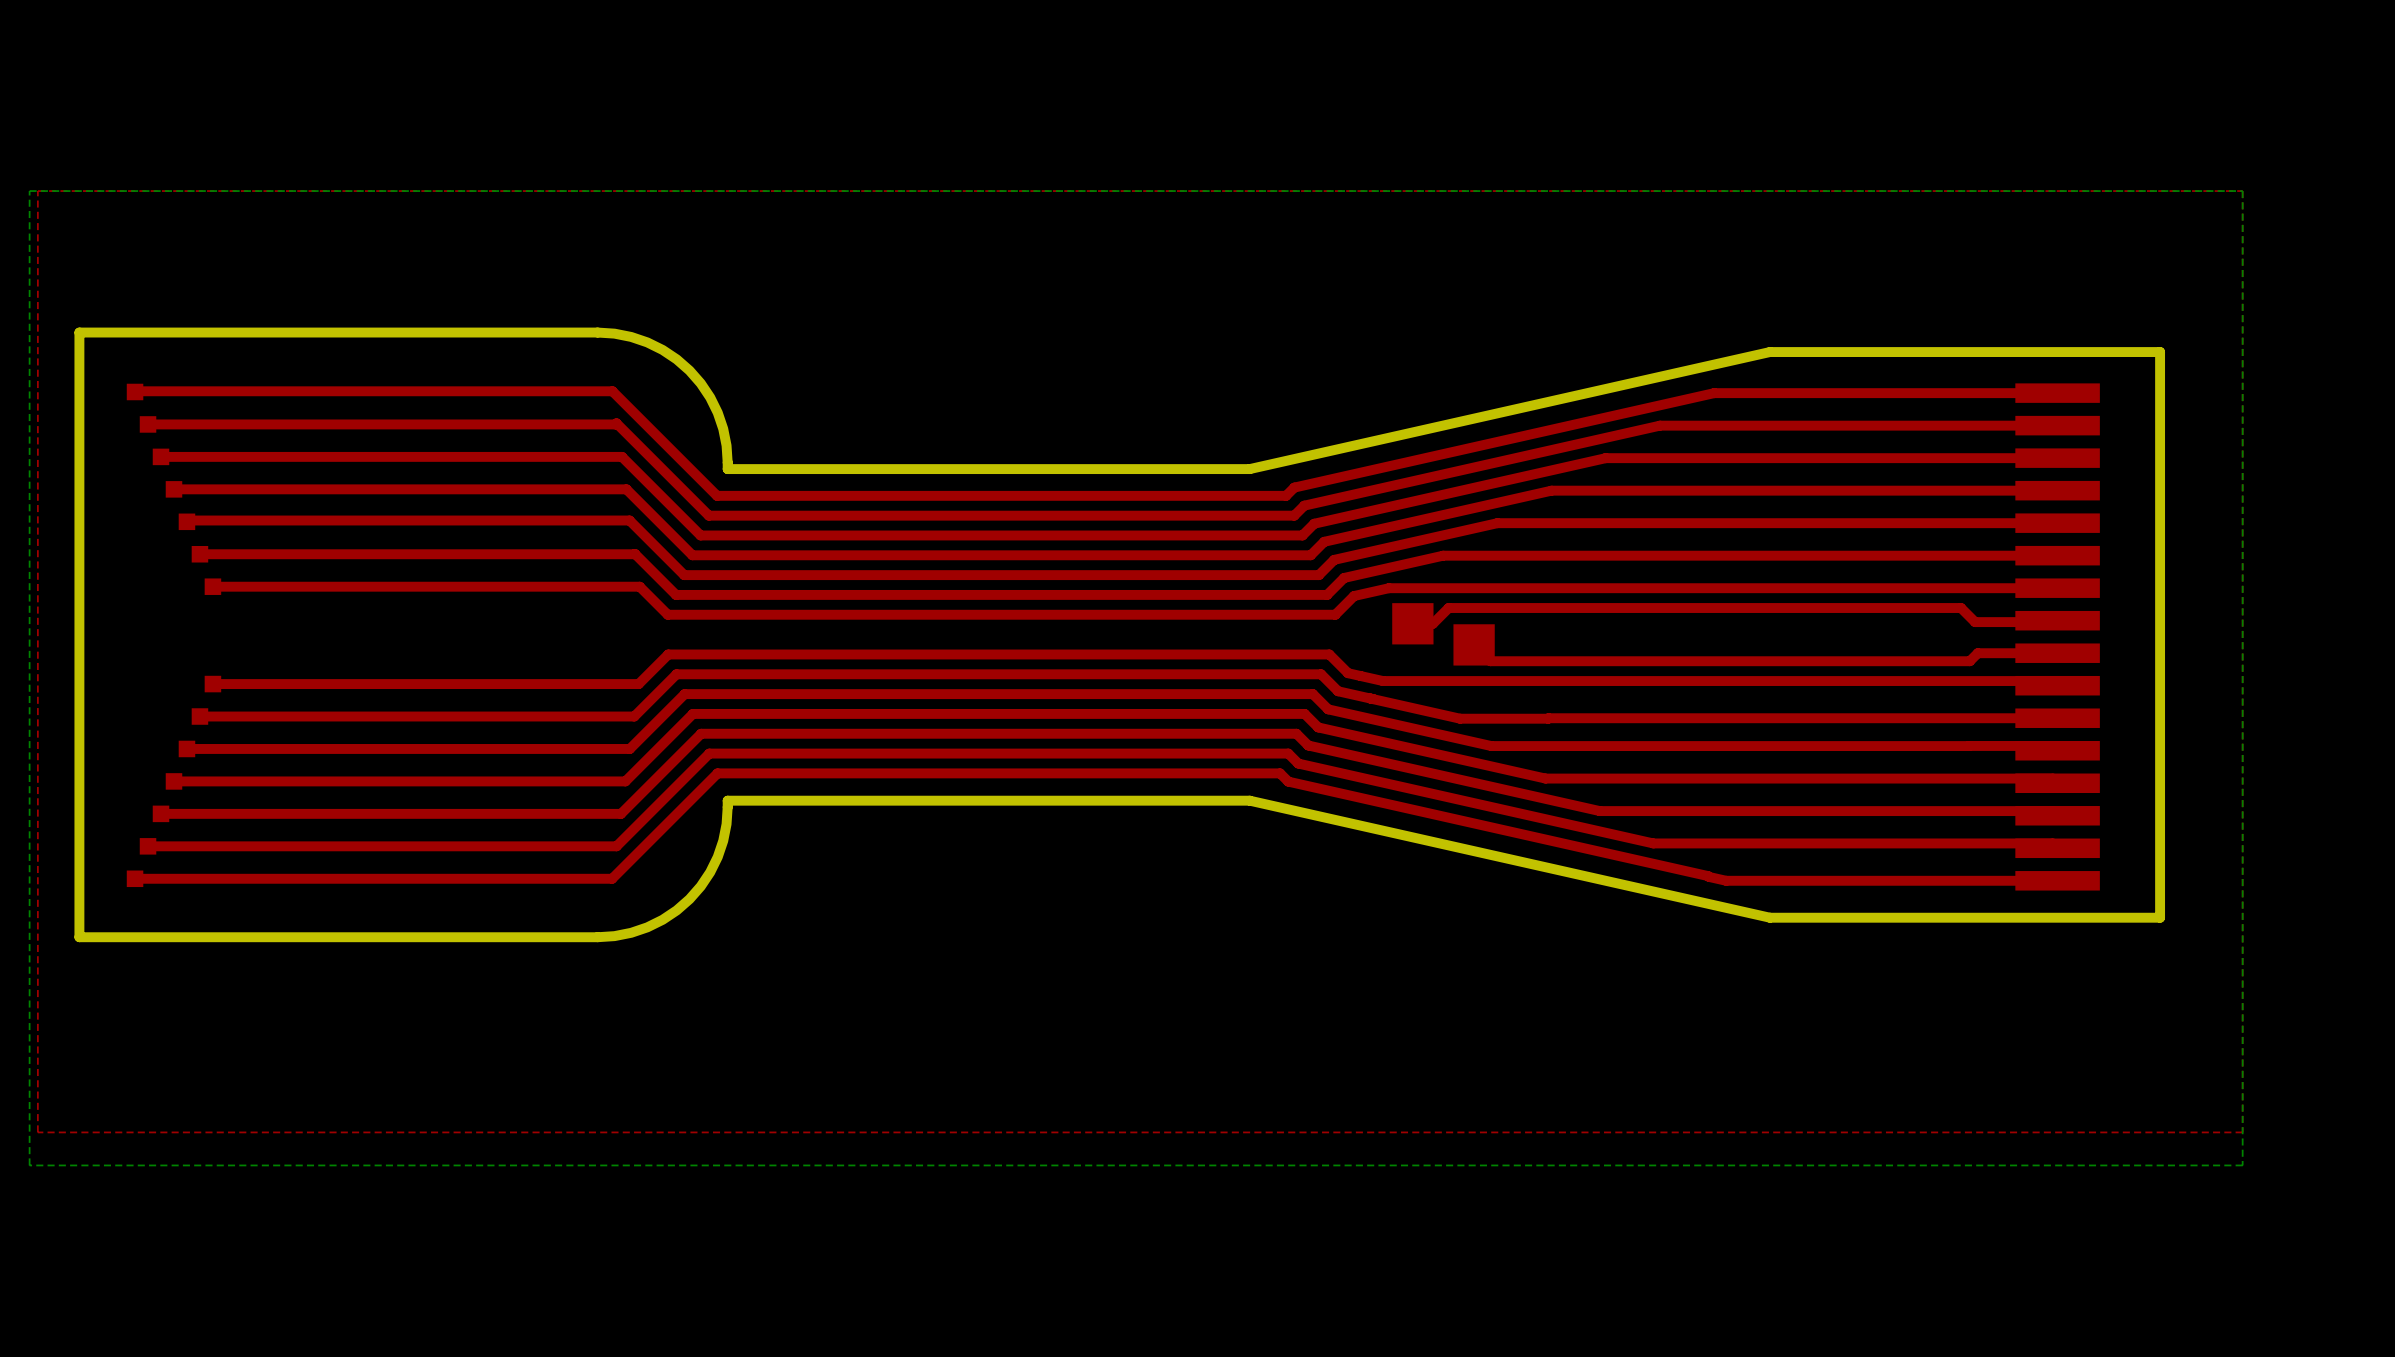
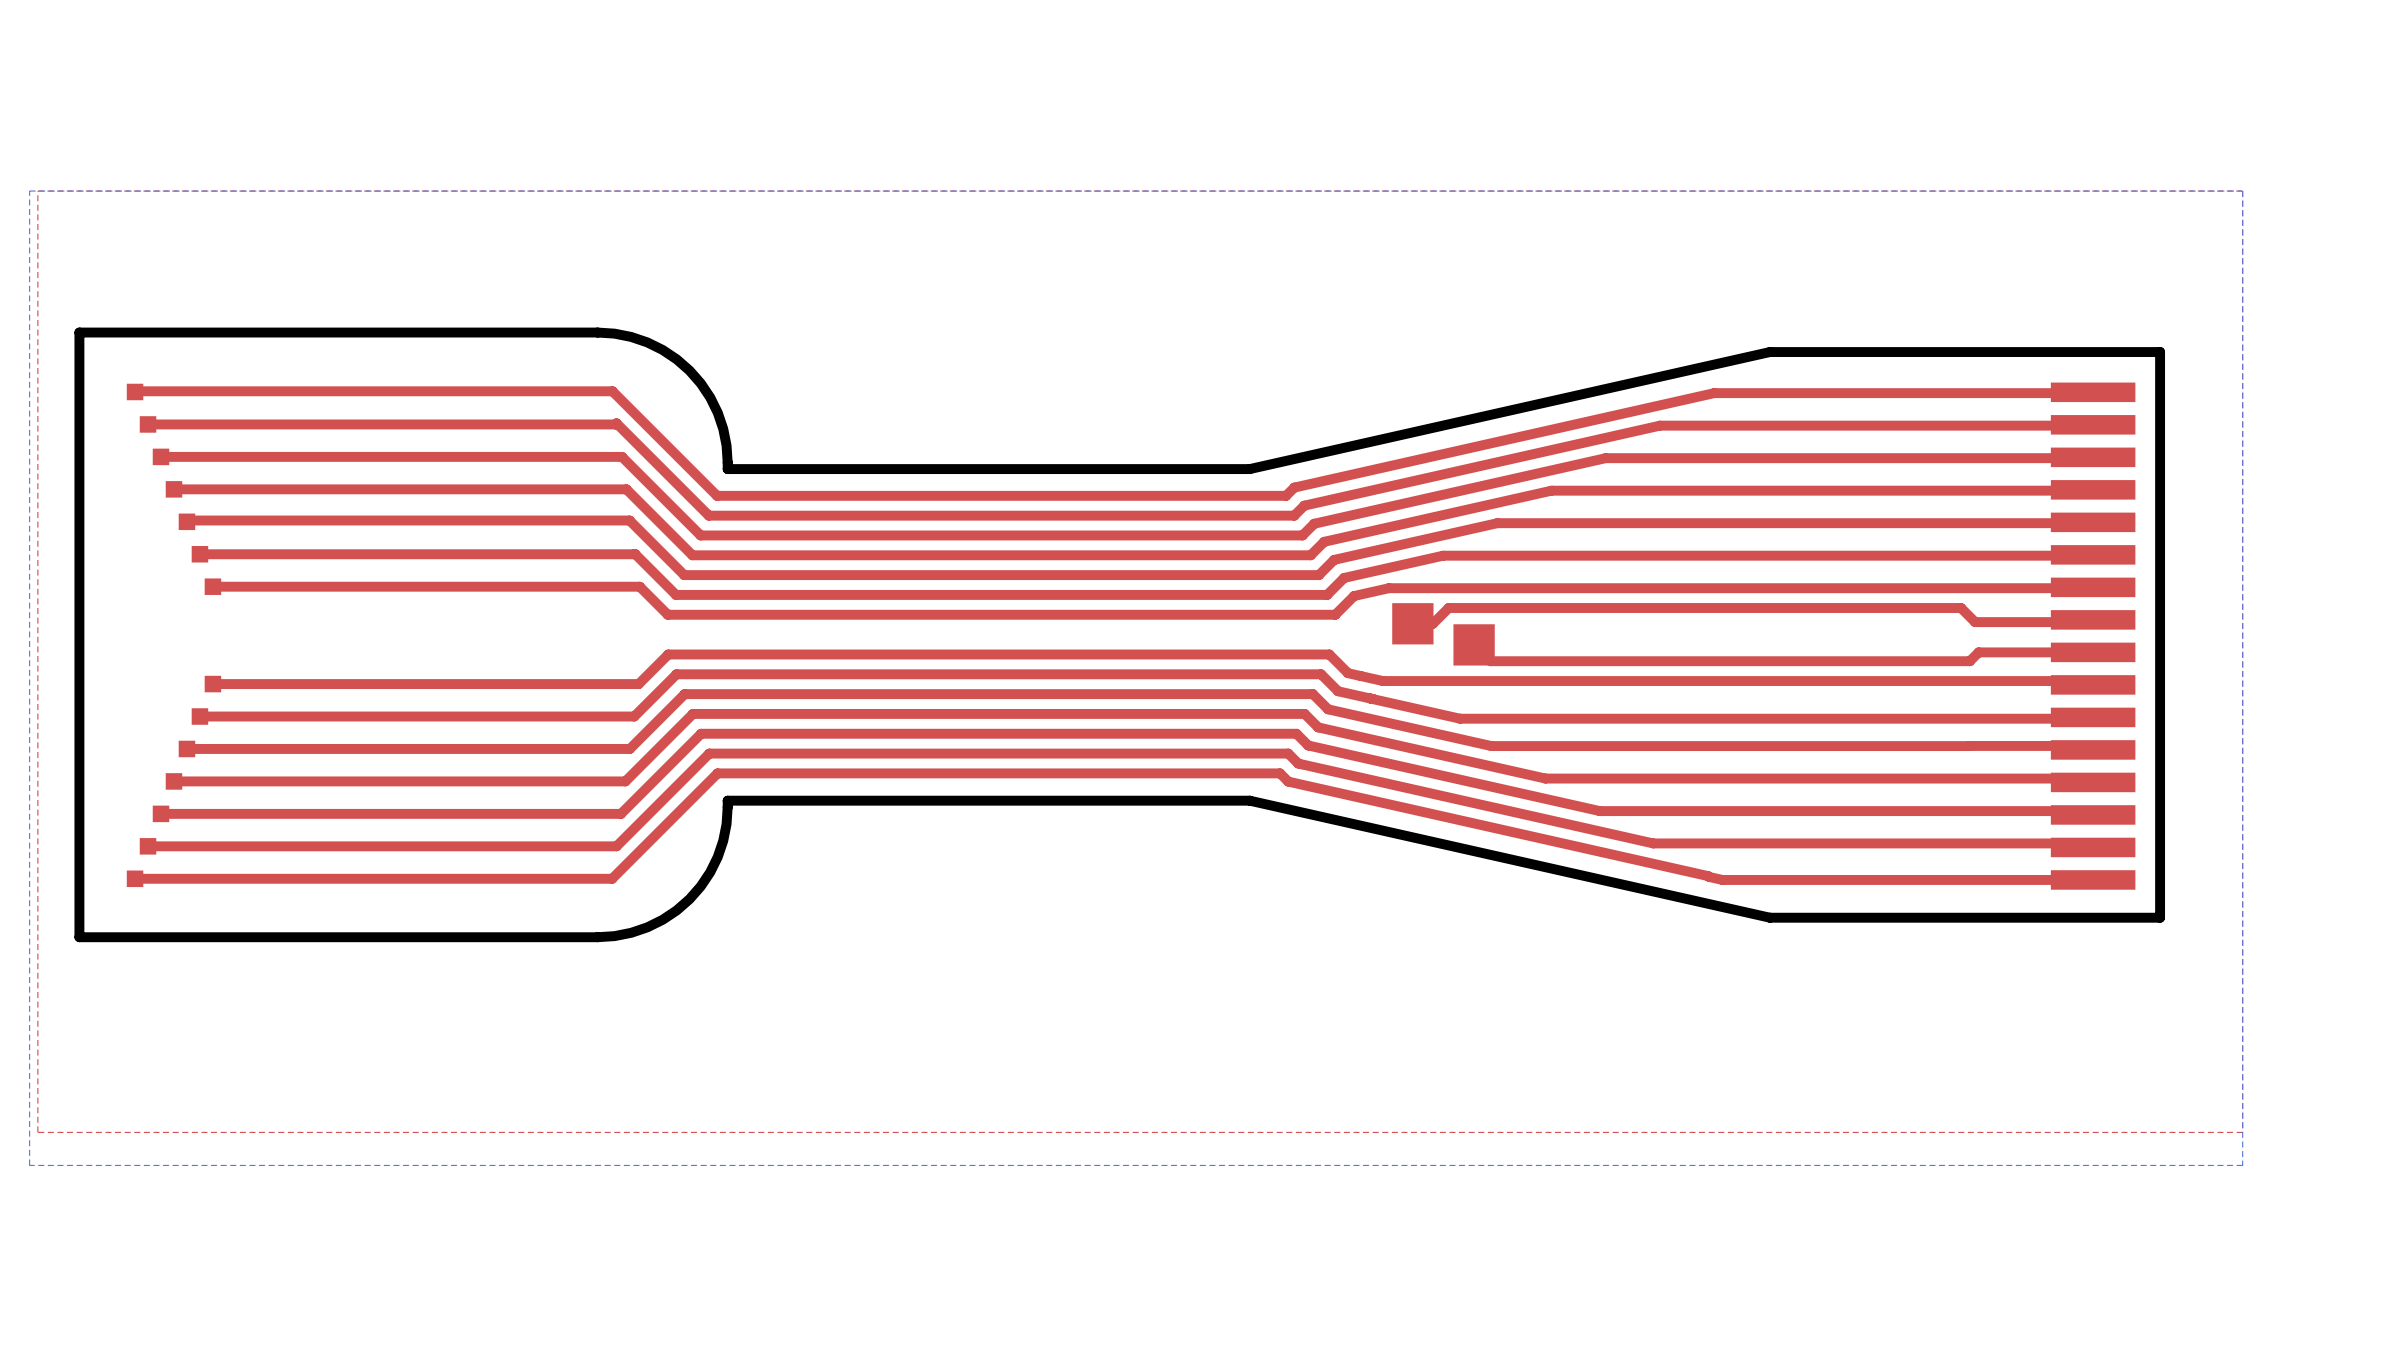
part position: (2057, 636) -> (2093, 636)
top track: (2057, 653) (1977, 653) -> (2093, 652) (1978, 652)
top track: (2057, 718) (1548, 718) -> (2093, 717) (1548, 718)
top track: (1722, 879) (2057, 880) -> (1722, 879) (2093, 879)

